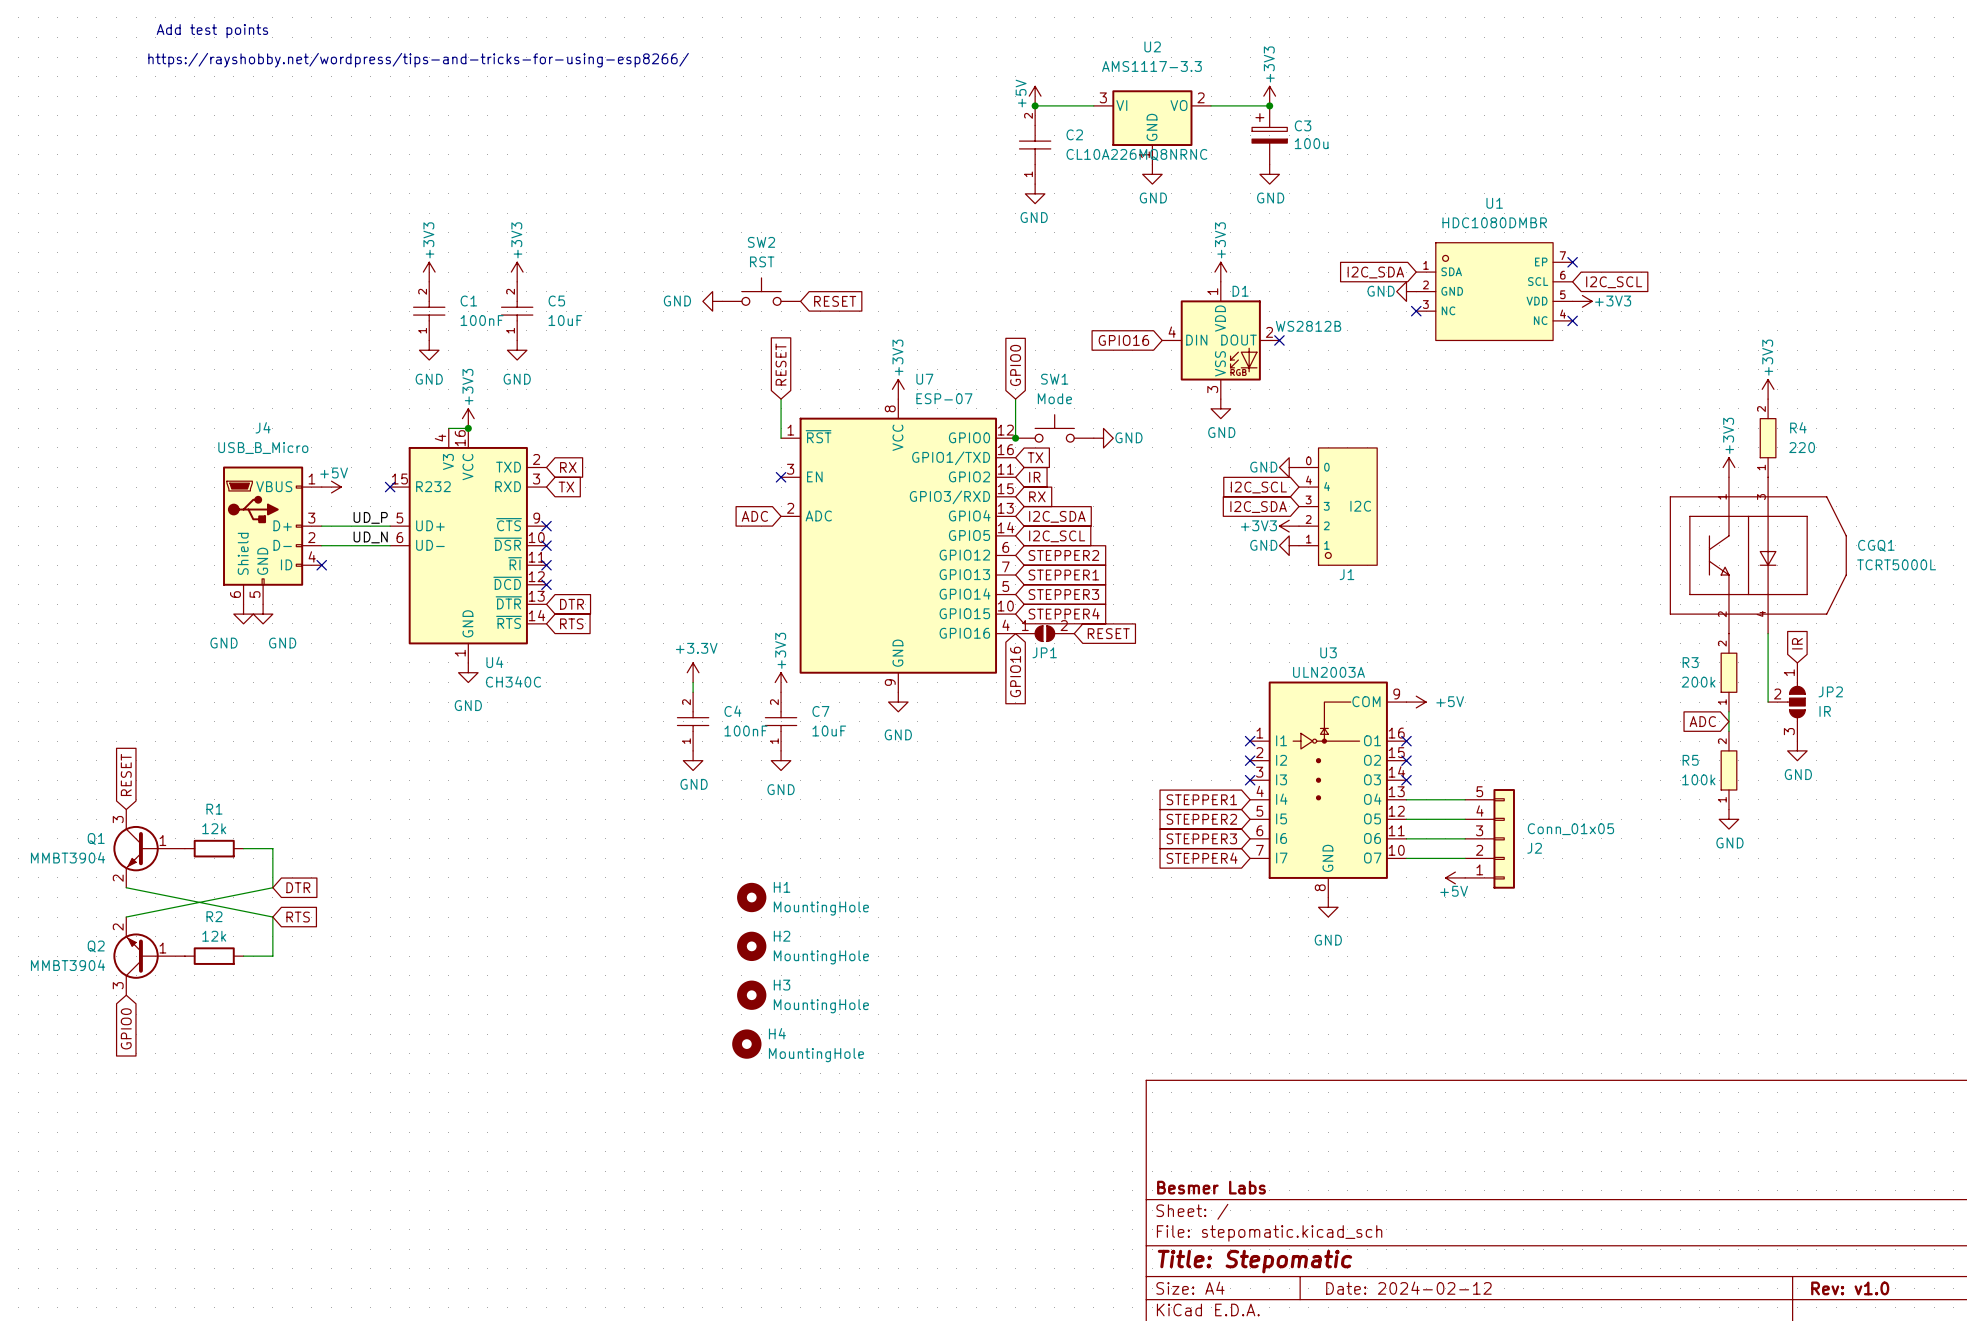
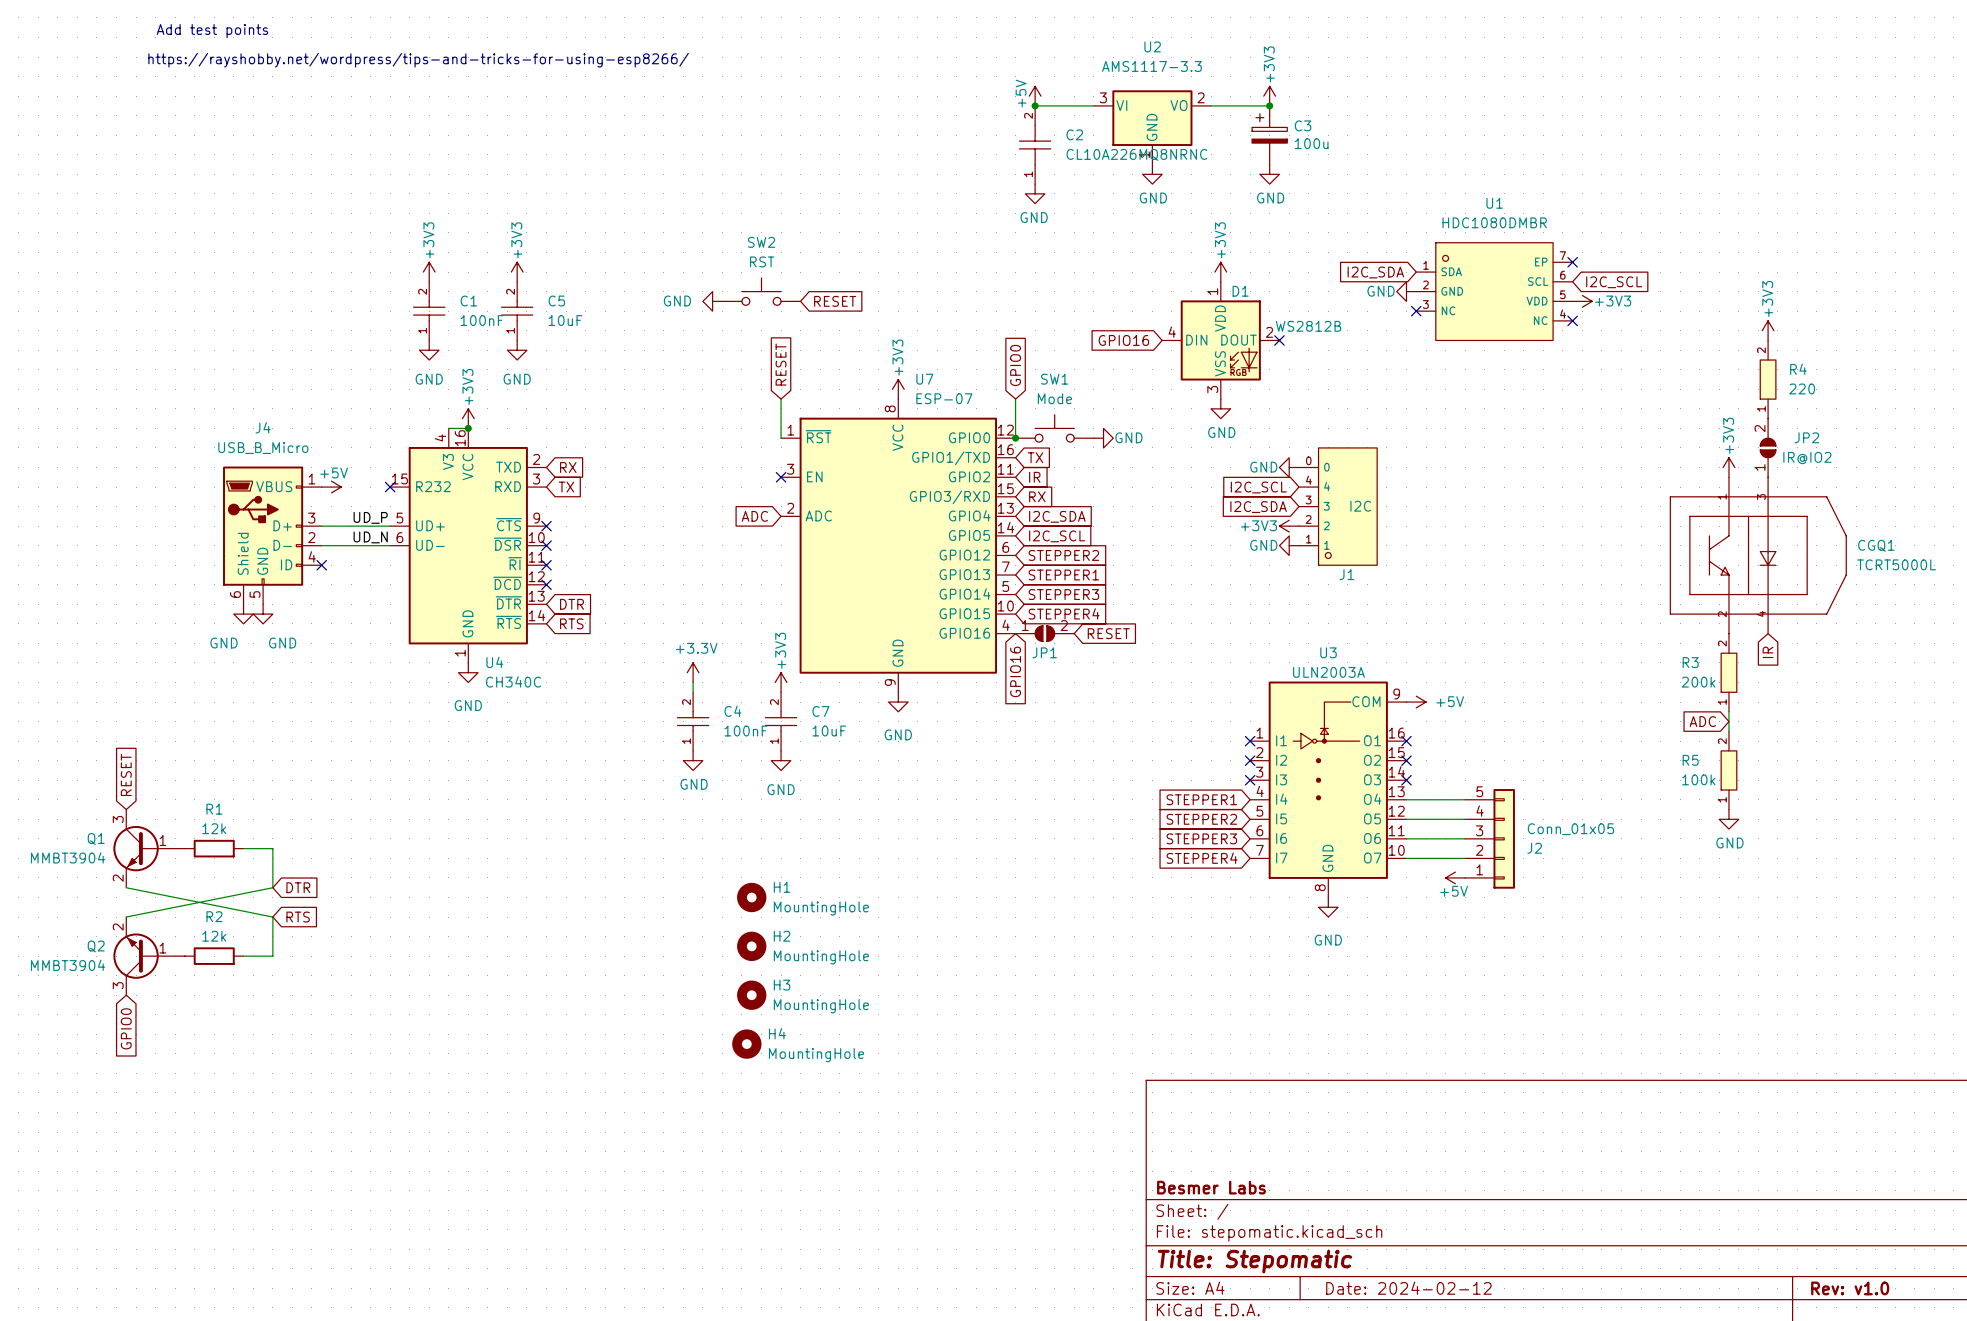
power symbol position: +3V3 (1768, 389) -> +3V3 (1768, 330)
R4 position: (1768, 438) -> (1768, 379)
wire: (1768, 633) (1768, 702) -> none
global label rotation: 0° (1797, 643) -> 180° (1768, 652)
JP2 symbol: [1768, 662, 1806, 742] -> [1760, 418, 1776, 478]
JP2 value: IR (1825, 711) -> IR@IO2 (1807, 458)
power symbol: GND (1797, 750) -> none

